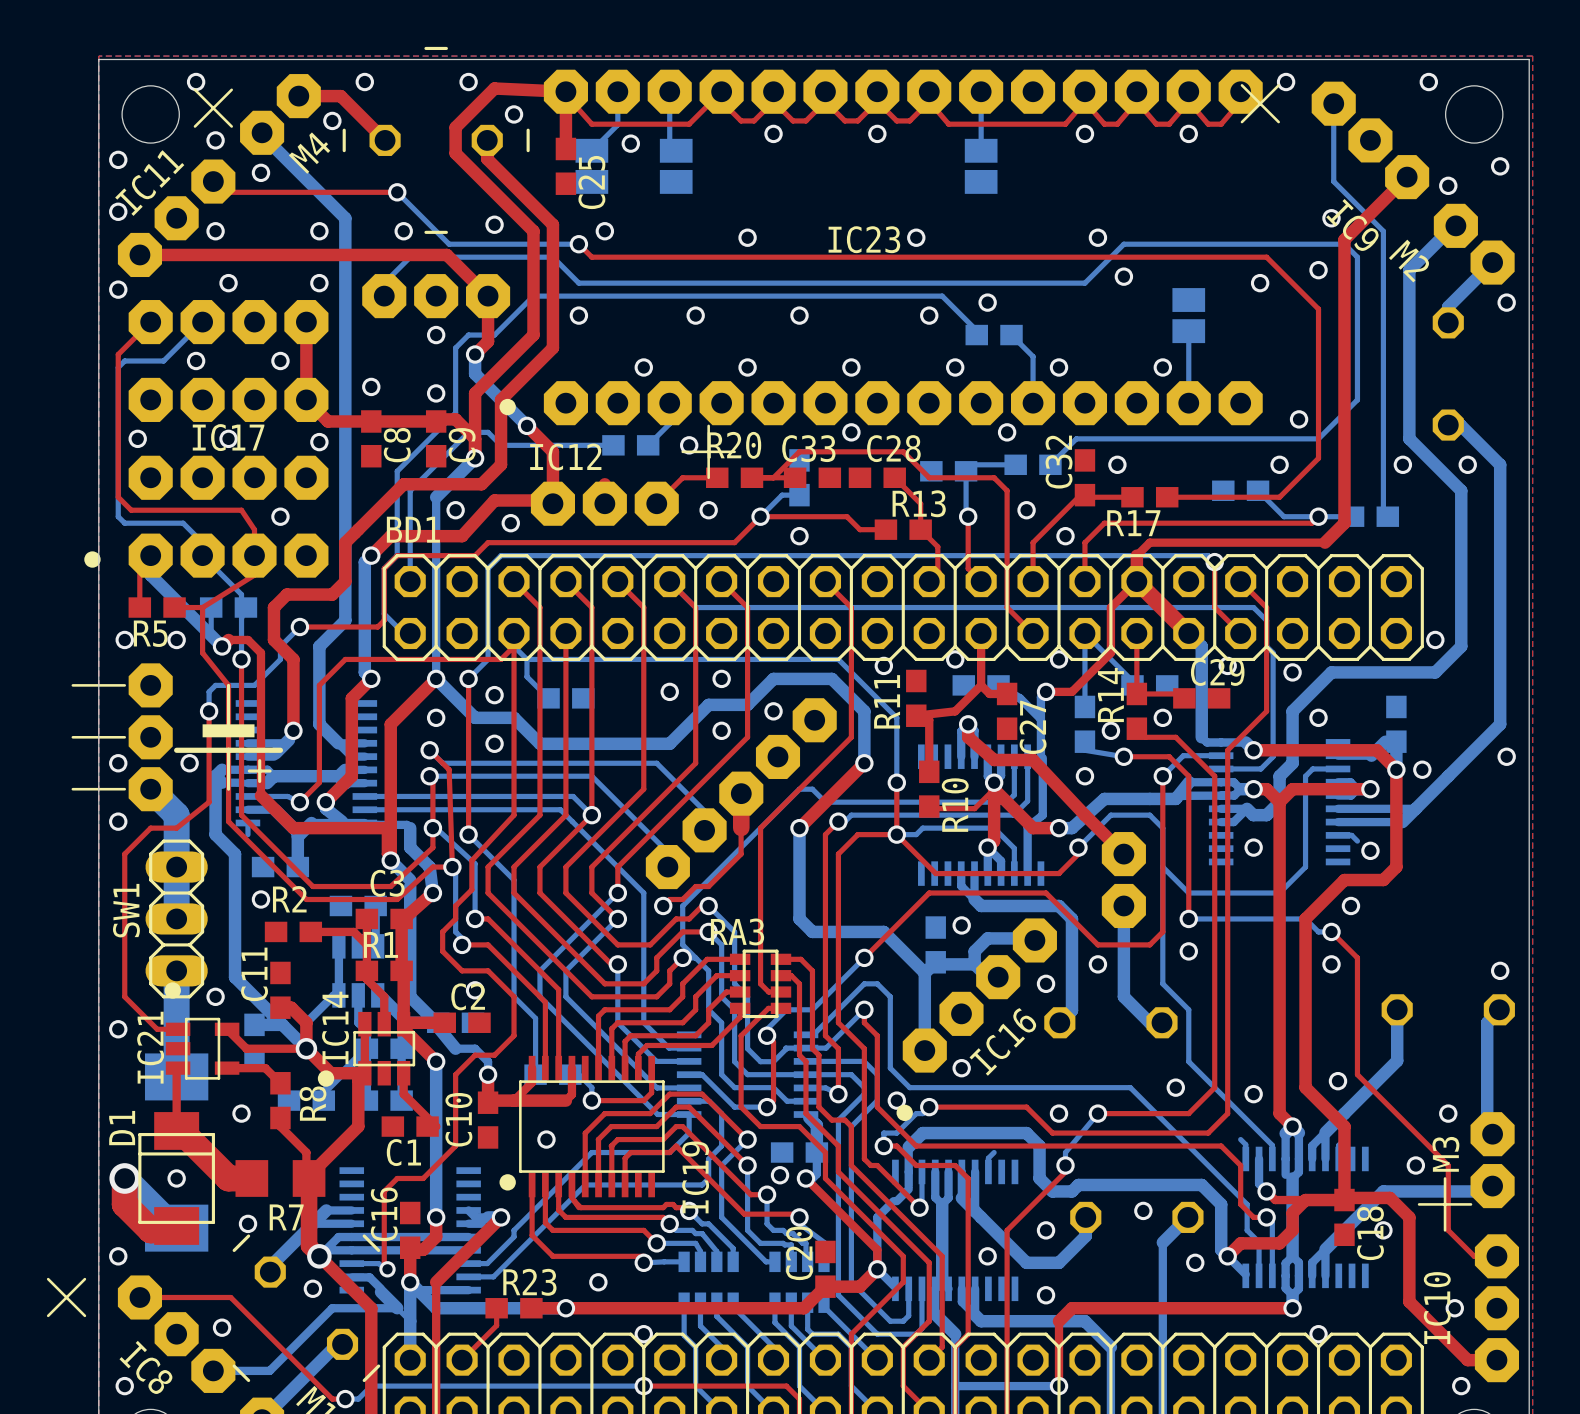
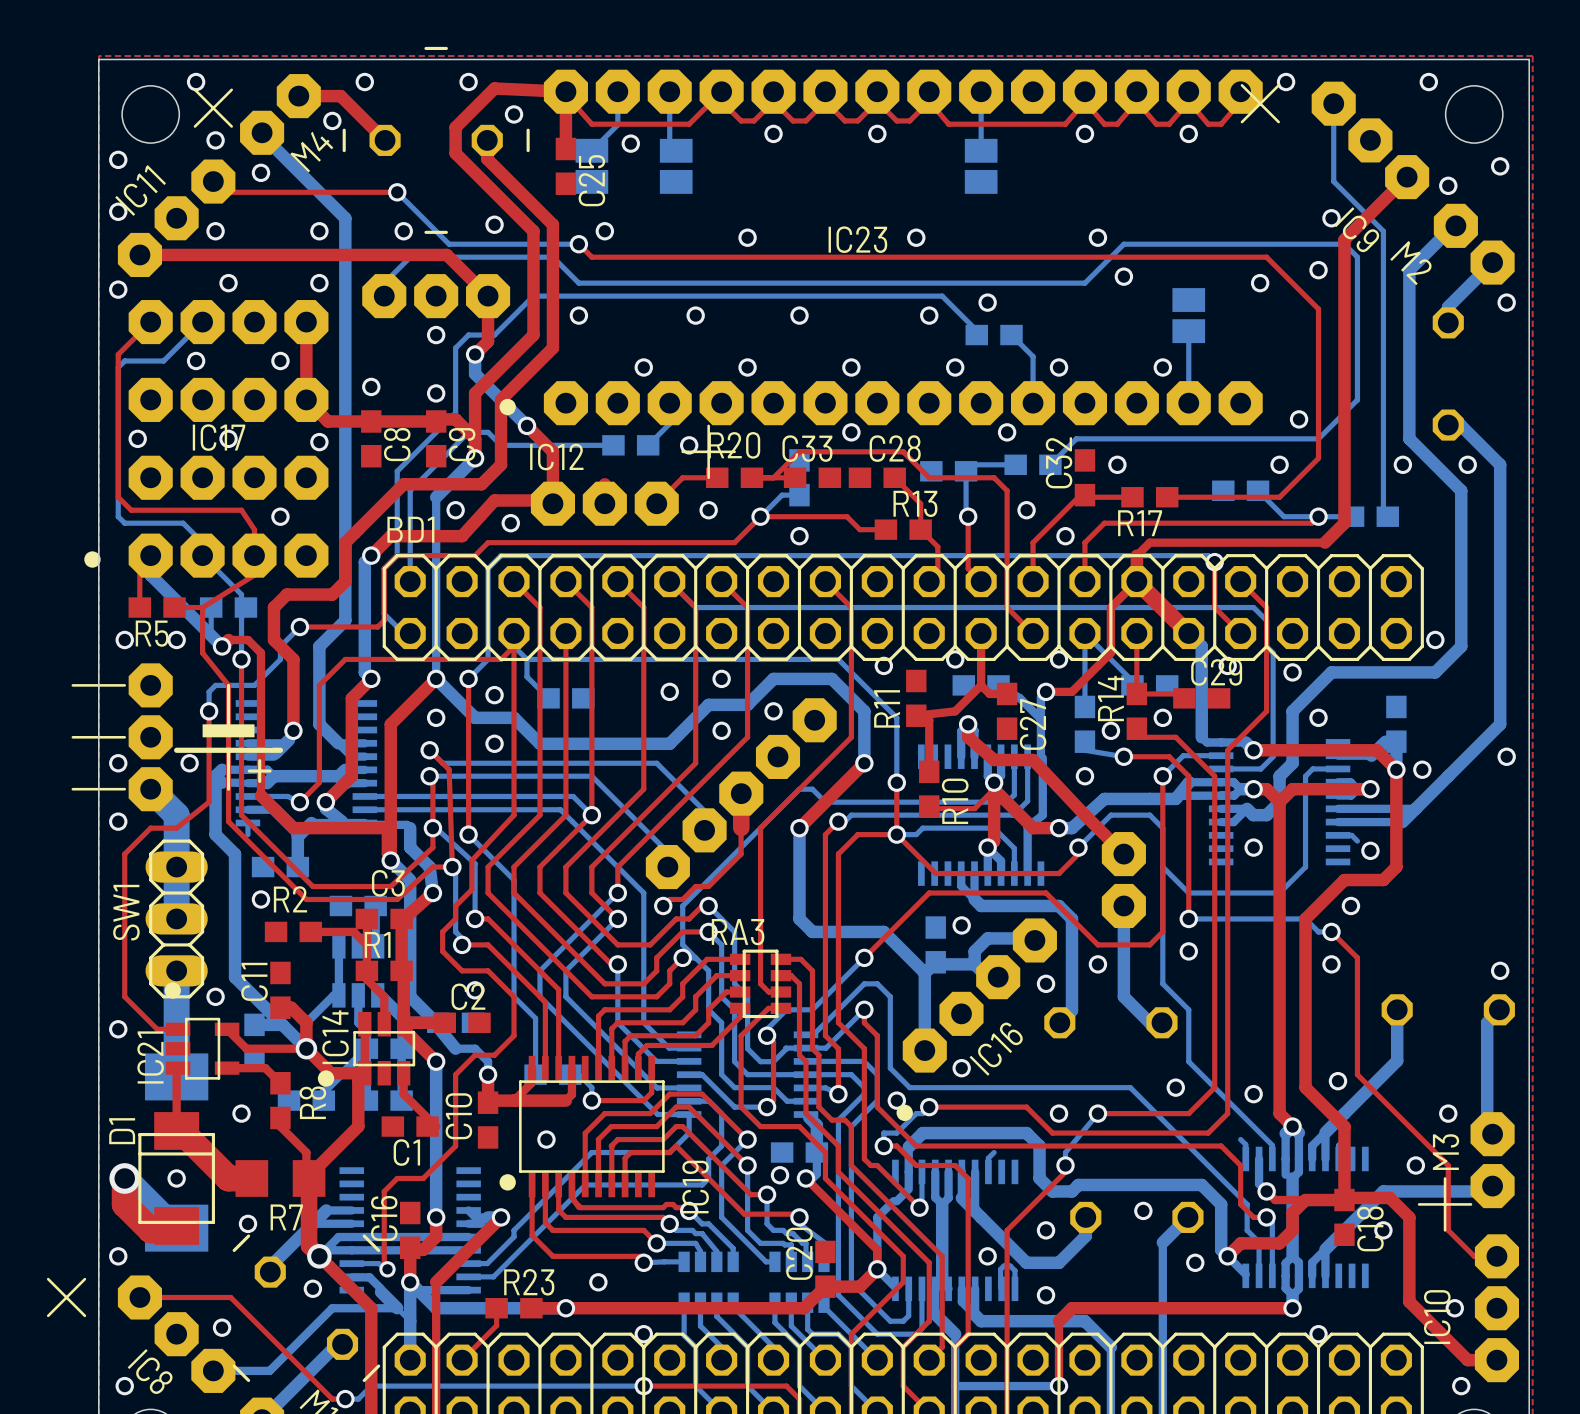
bottom track: none -> (1001, 1288) (1000, 1269) (1003, 1266) (1010, 1266) (1014, 1270) (1014, 1288)

